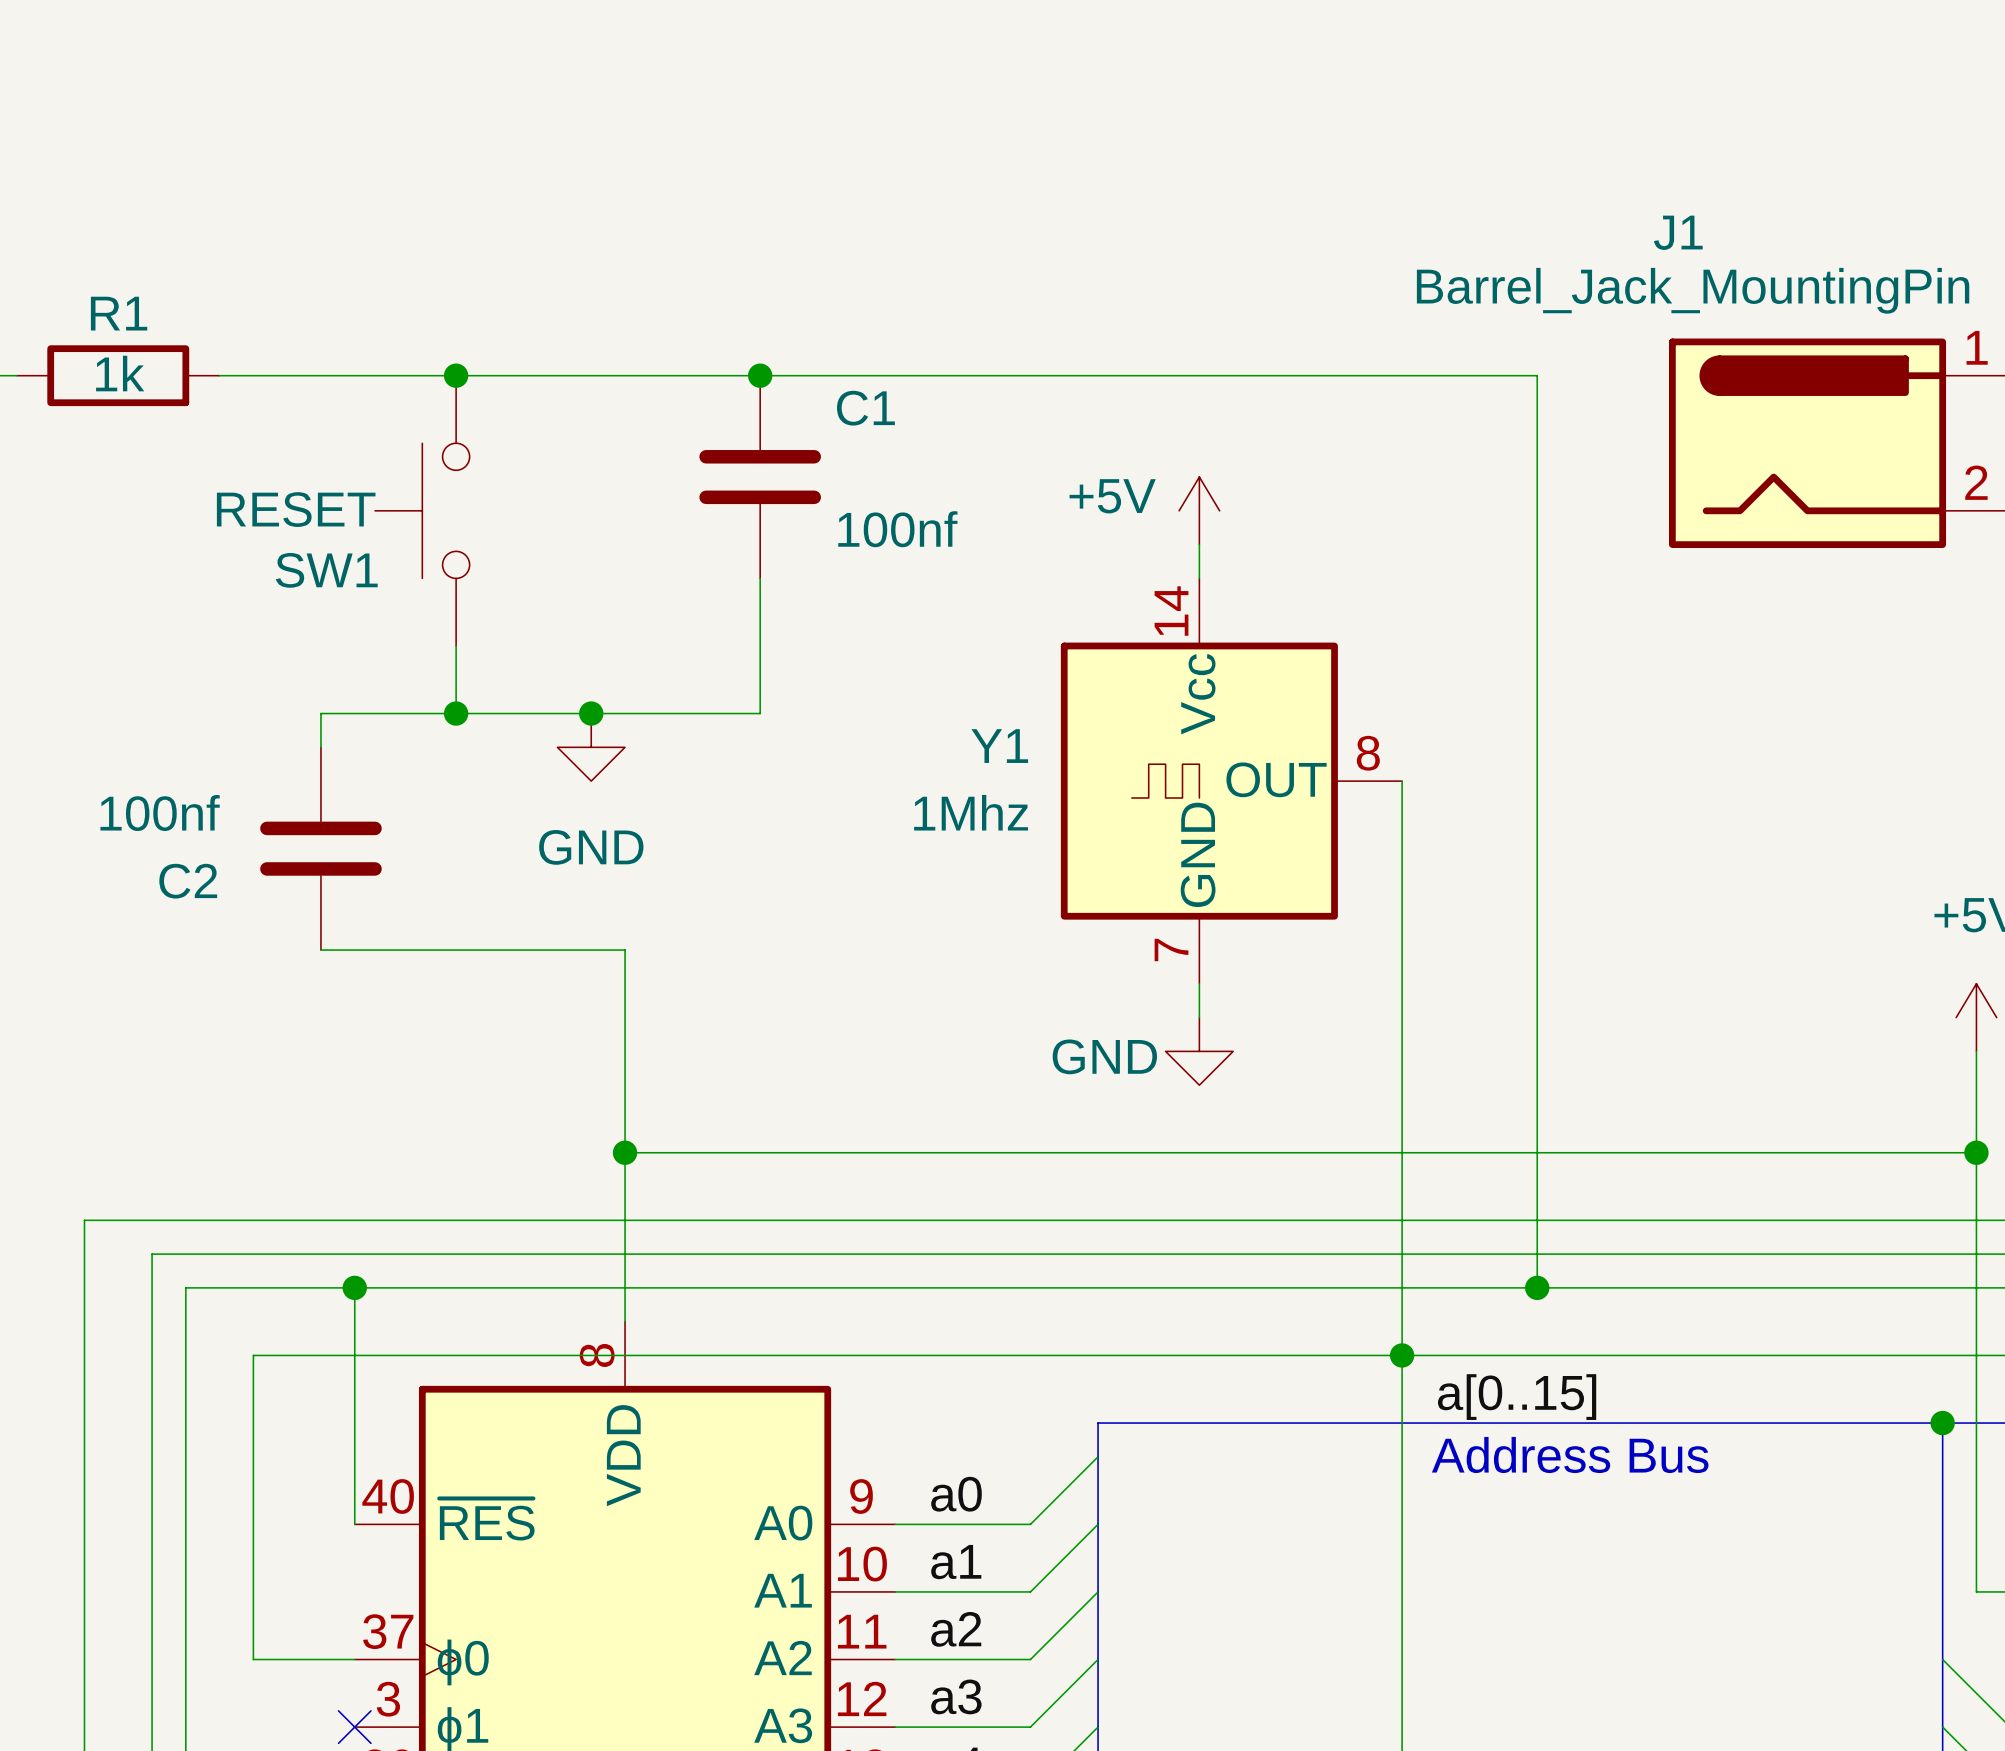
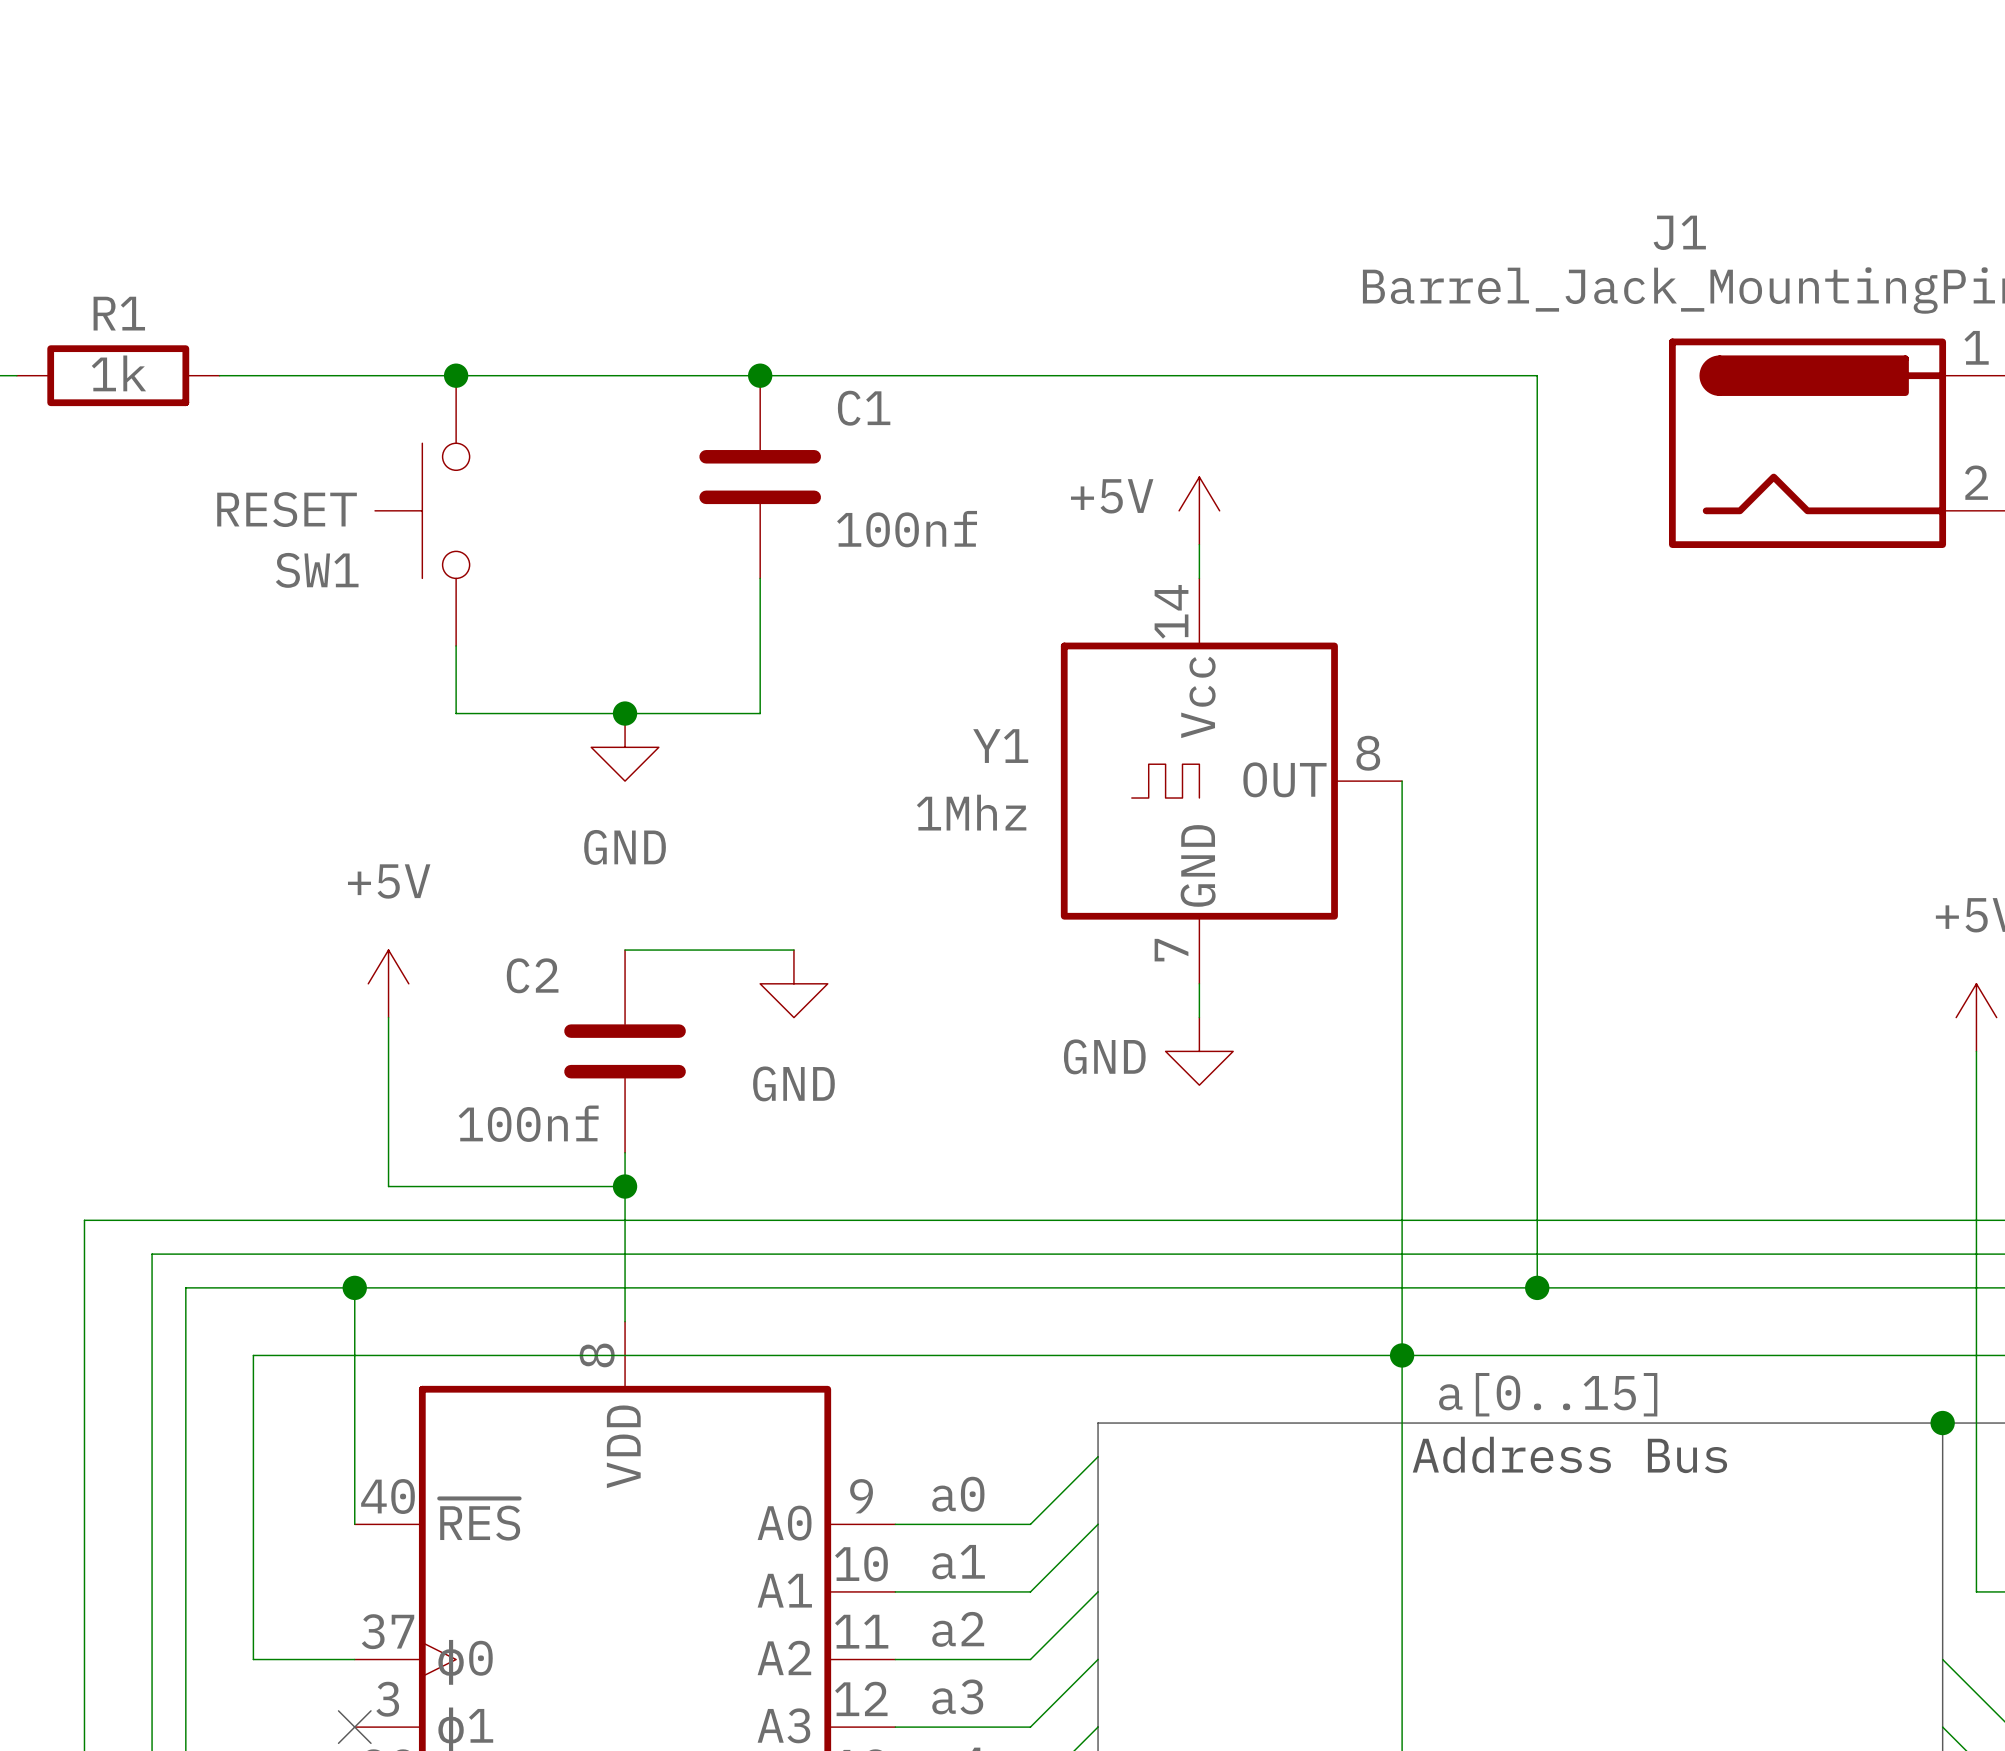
wire: (456, 713) (320, 713) (320, 747) -> none
junction: (456, 713) -> none
junction position: (591, 713) -> (625, 713)
power symbol position: GND (591, 747) -> GND (625, 747)
C2 value position: 100nf (160, 813) -> 100nf (528, 1123)
C2 position: (320, 848) -> (625, 1051)
C2 name position: C2 (188, 881) -> C2 (532, 975)
wire: (320, 950) (625, 950) (625, 1152) (1976, 1152) -> none
wire: none -> (625, 950) (793, 950)
power symbol: none -> +5V (388, 983)
power symbol: none -> GND (793, 983)
wire: none -> (388, 1017) (388, 1186) (625, 1186)
junction position: (625, 1152) -> (625, 1186)
junction: (1976, 1152) -> none

